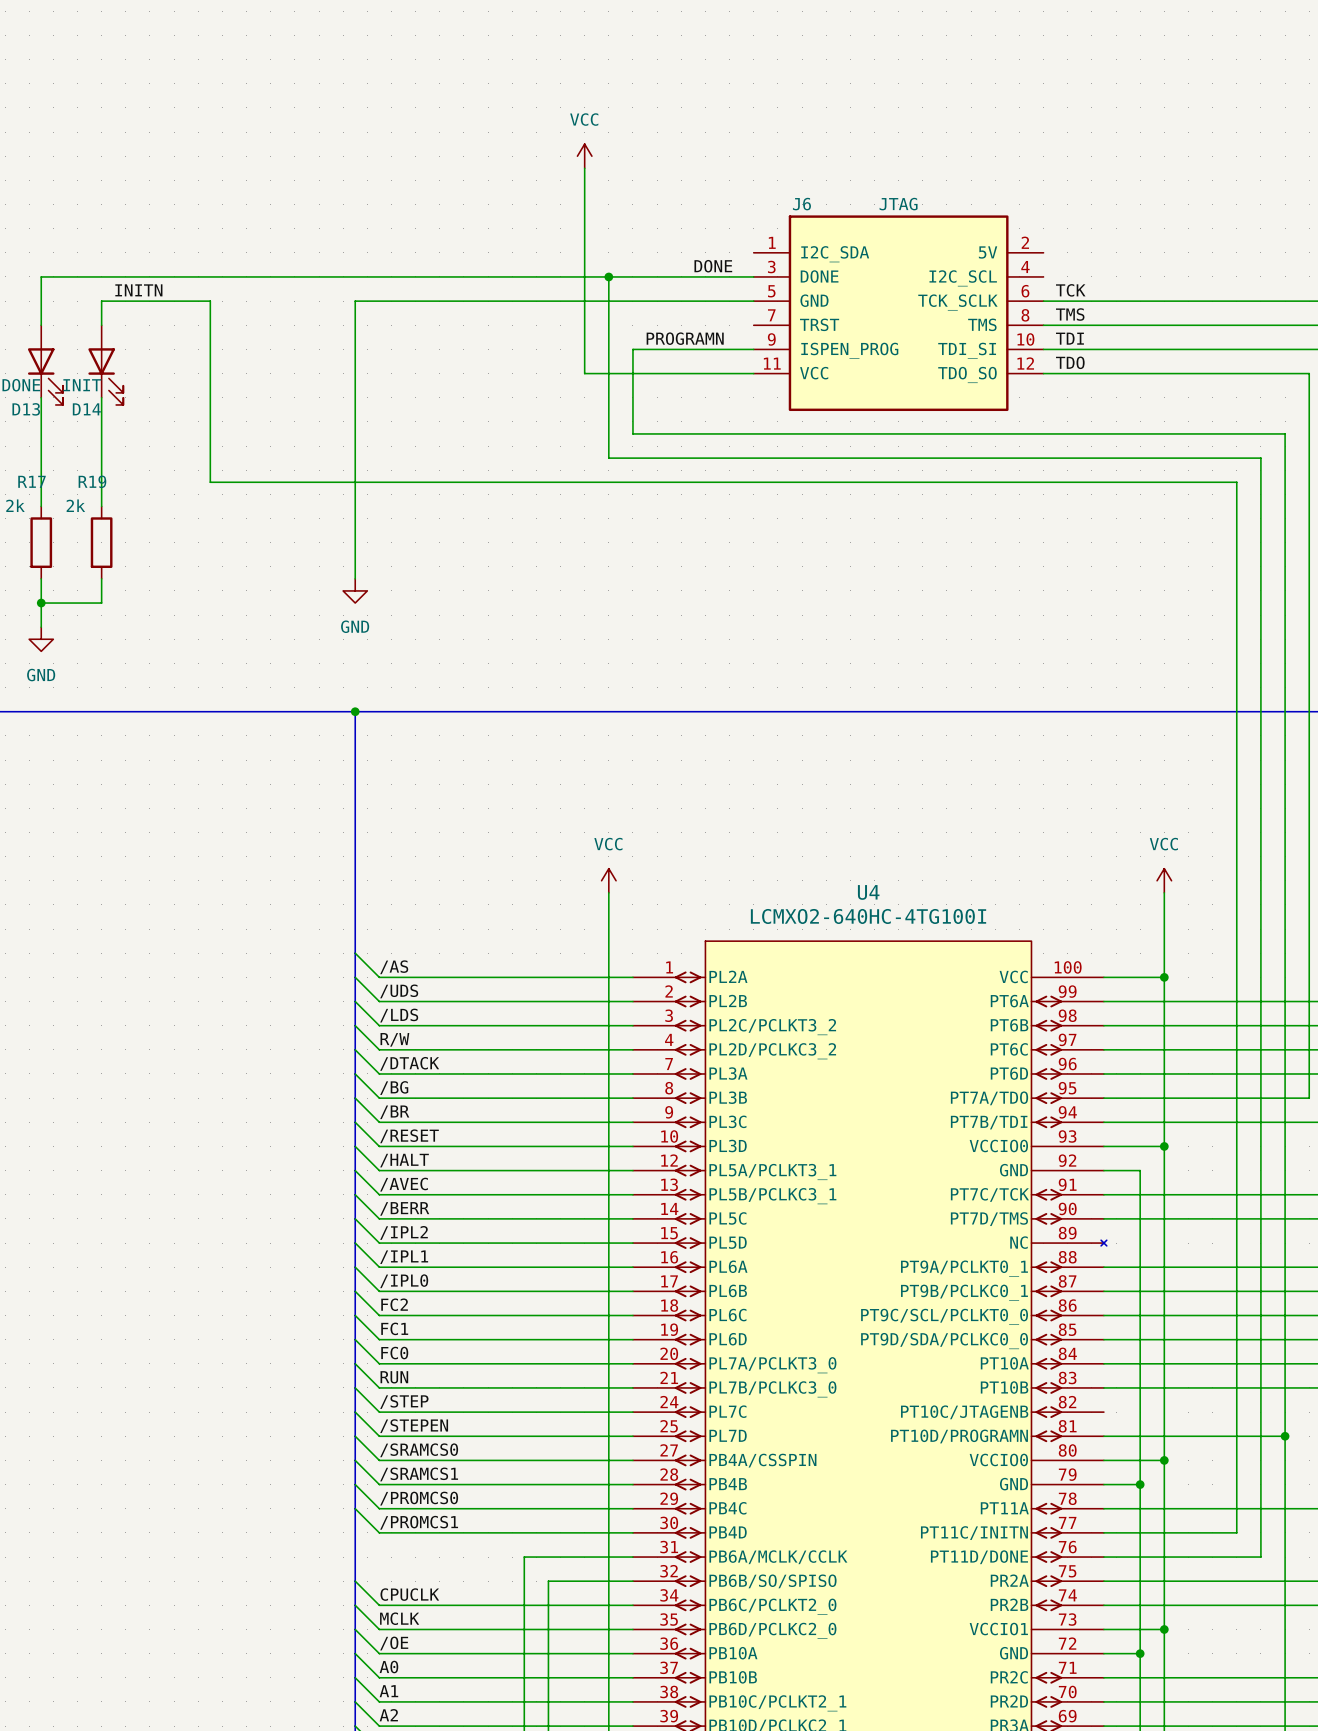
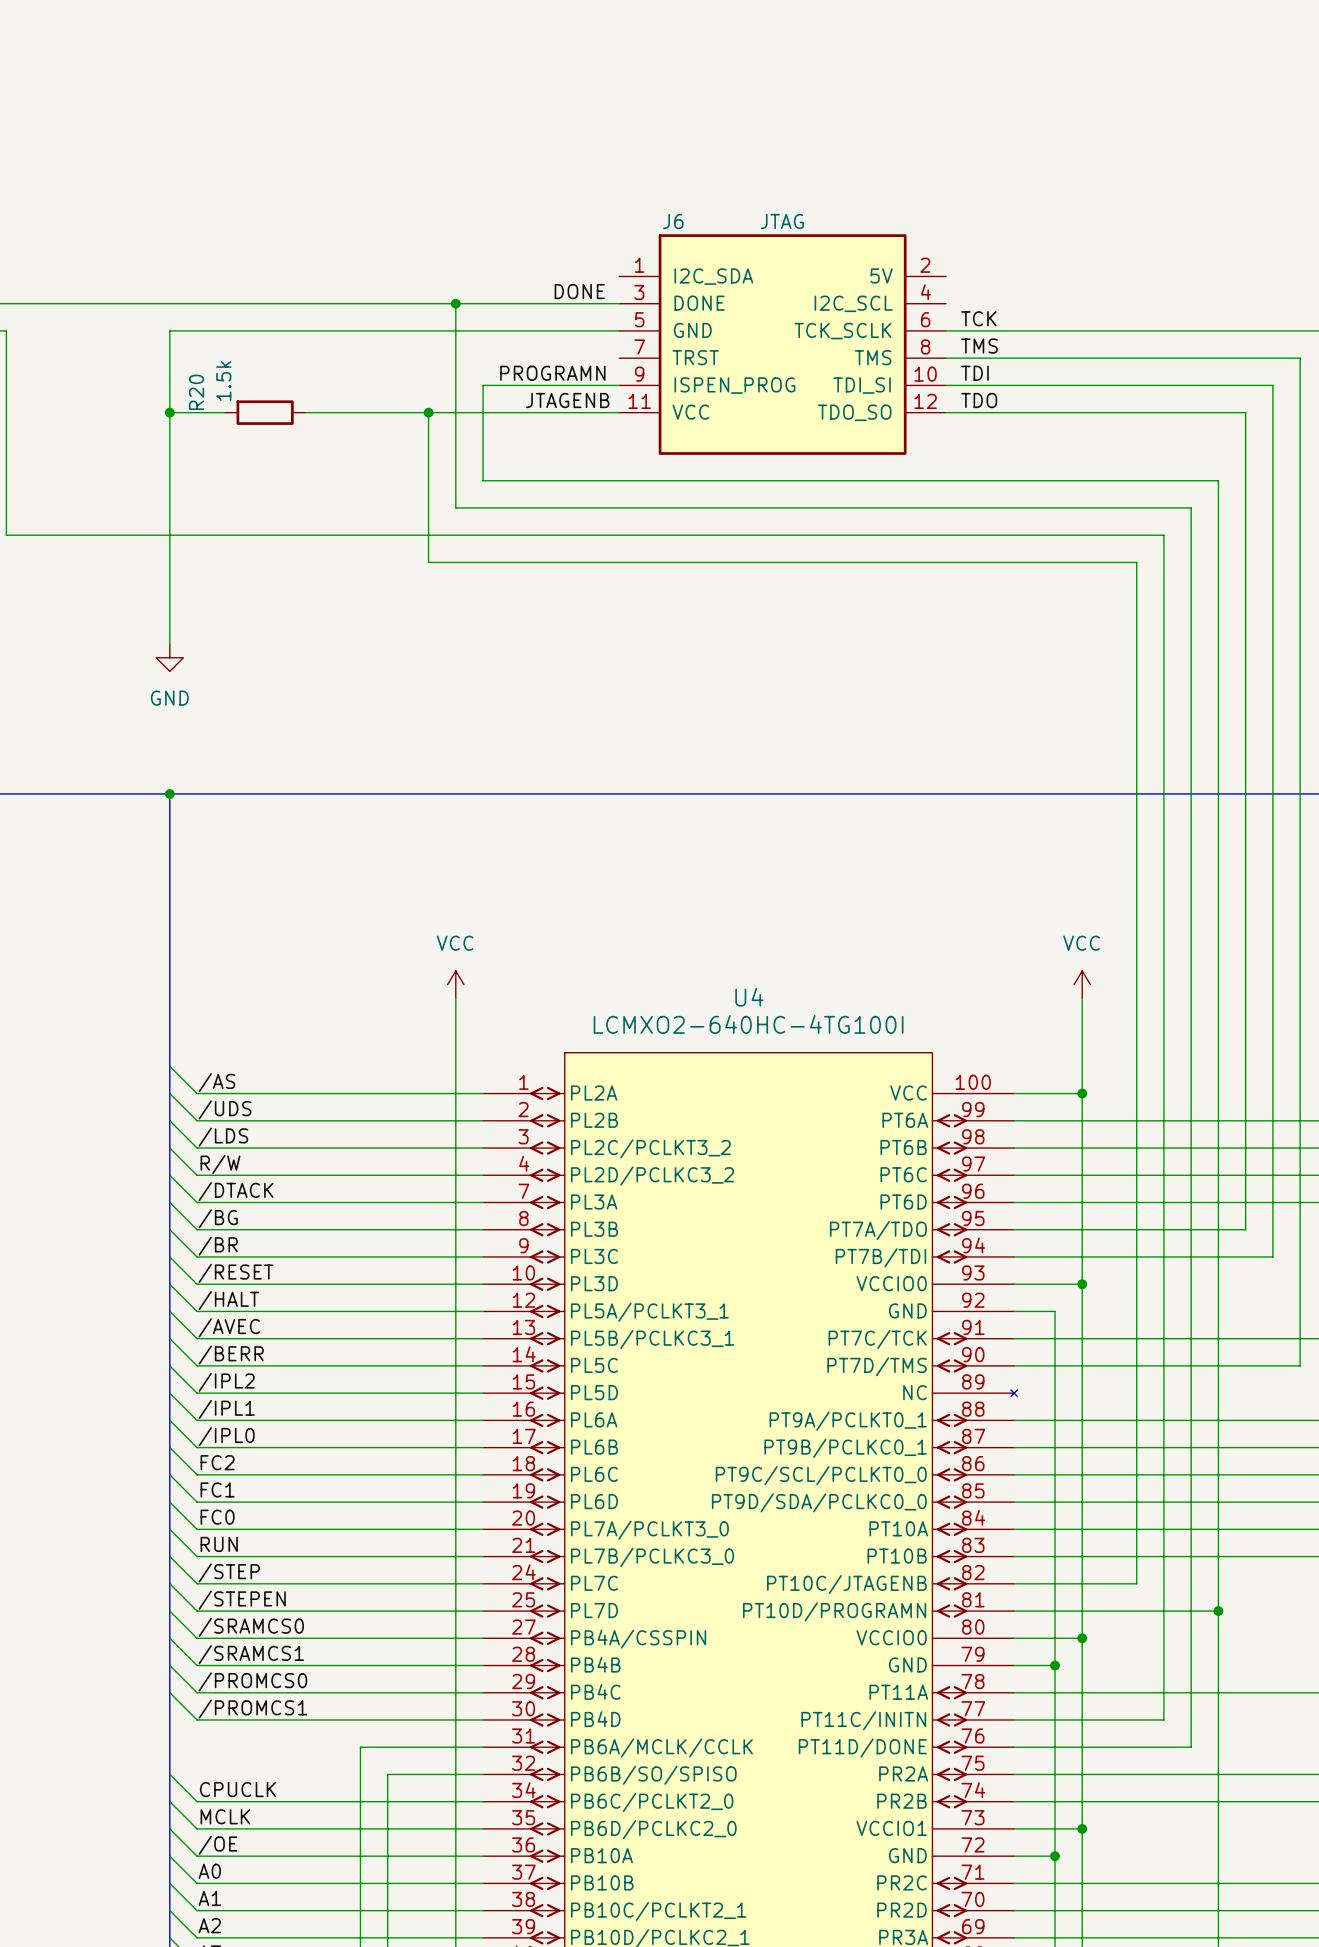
power symbol: VCC (584, 156) -> none
wire: (584, 168) (584, 373) -> none
label: none -> JTAGENB (567, 400)
wire: none -> (169, 412) (224, 412)
junction: none -> (169, 412)
R20: none -> 1.5k (265, 412)
wire: none -> (306, 412) (428, 412) (428, 562) (1136, 562) (1136, 1583) (1014, 1583)
junction: none -> (428, 412)

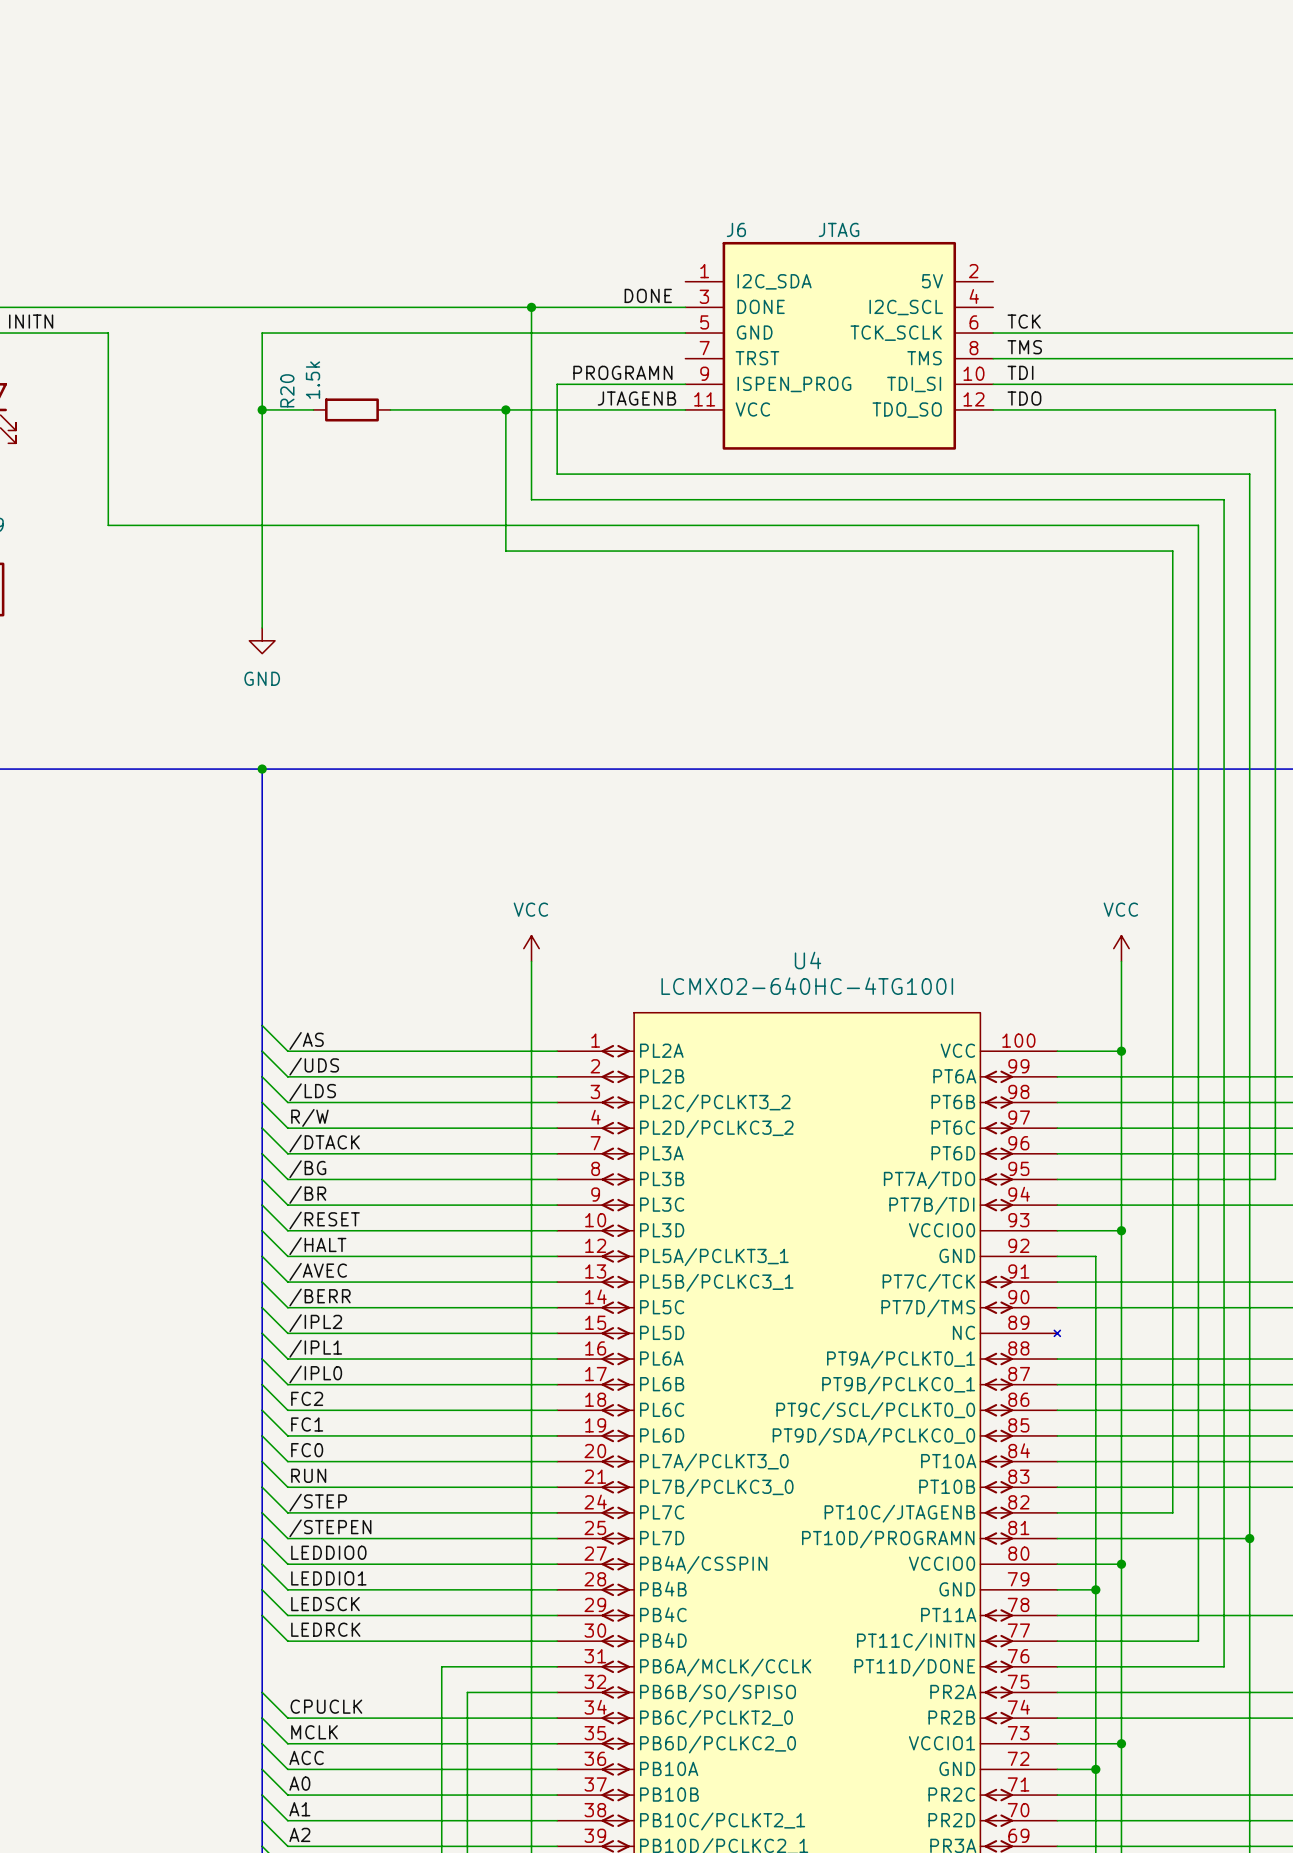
label: /SRAMCS0 (251, 1627) -> LEDDIO0 (328, 1552)
label: /SRAMCS1 (251, 1654) -> LEDDIO1 (328, 1578)
label: /PROMCS0 (252, 1681) -> LEDSCK (325, 1604)
label: /PROMCS1 (252, 1709) -> LEDRCK (325, 1629)
label: /OE (217, 1845) -> ACC (306, 1757)

